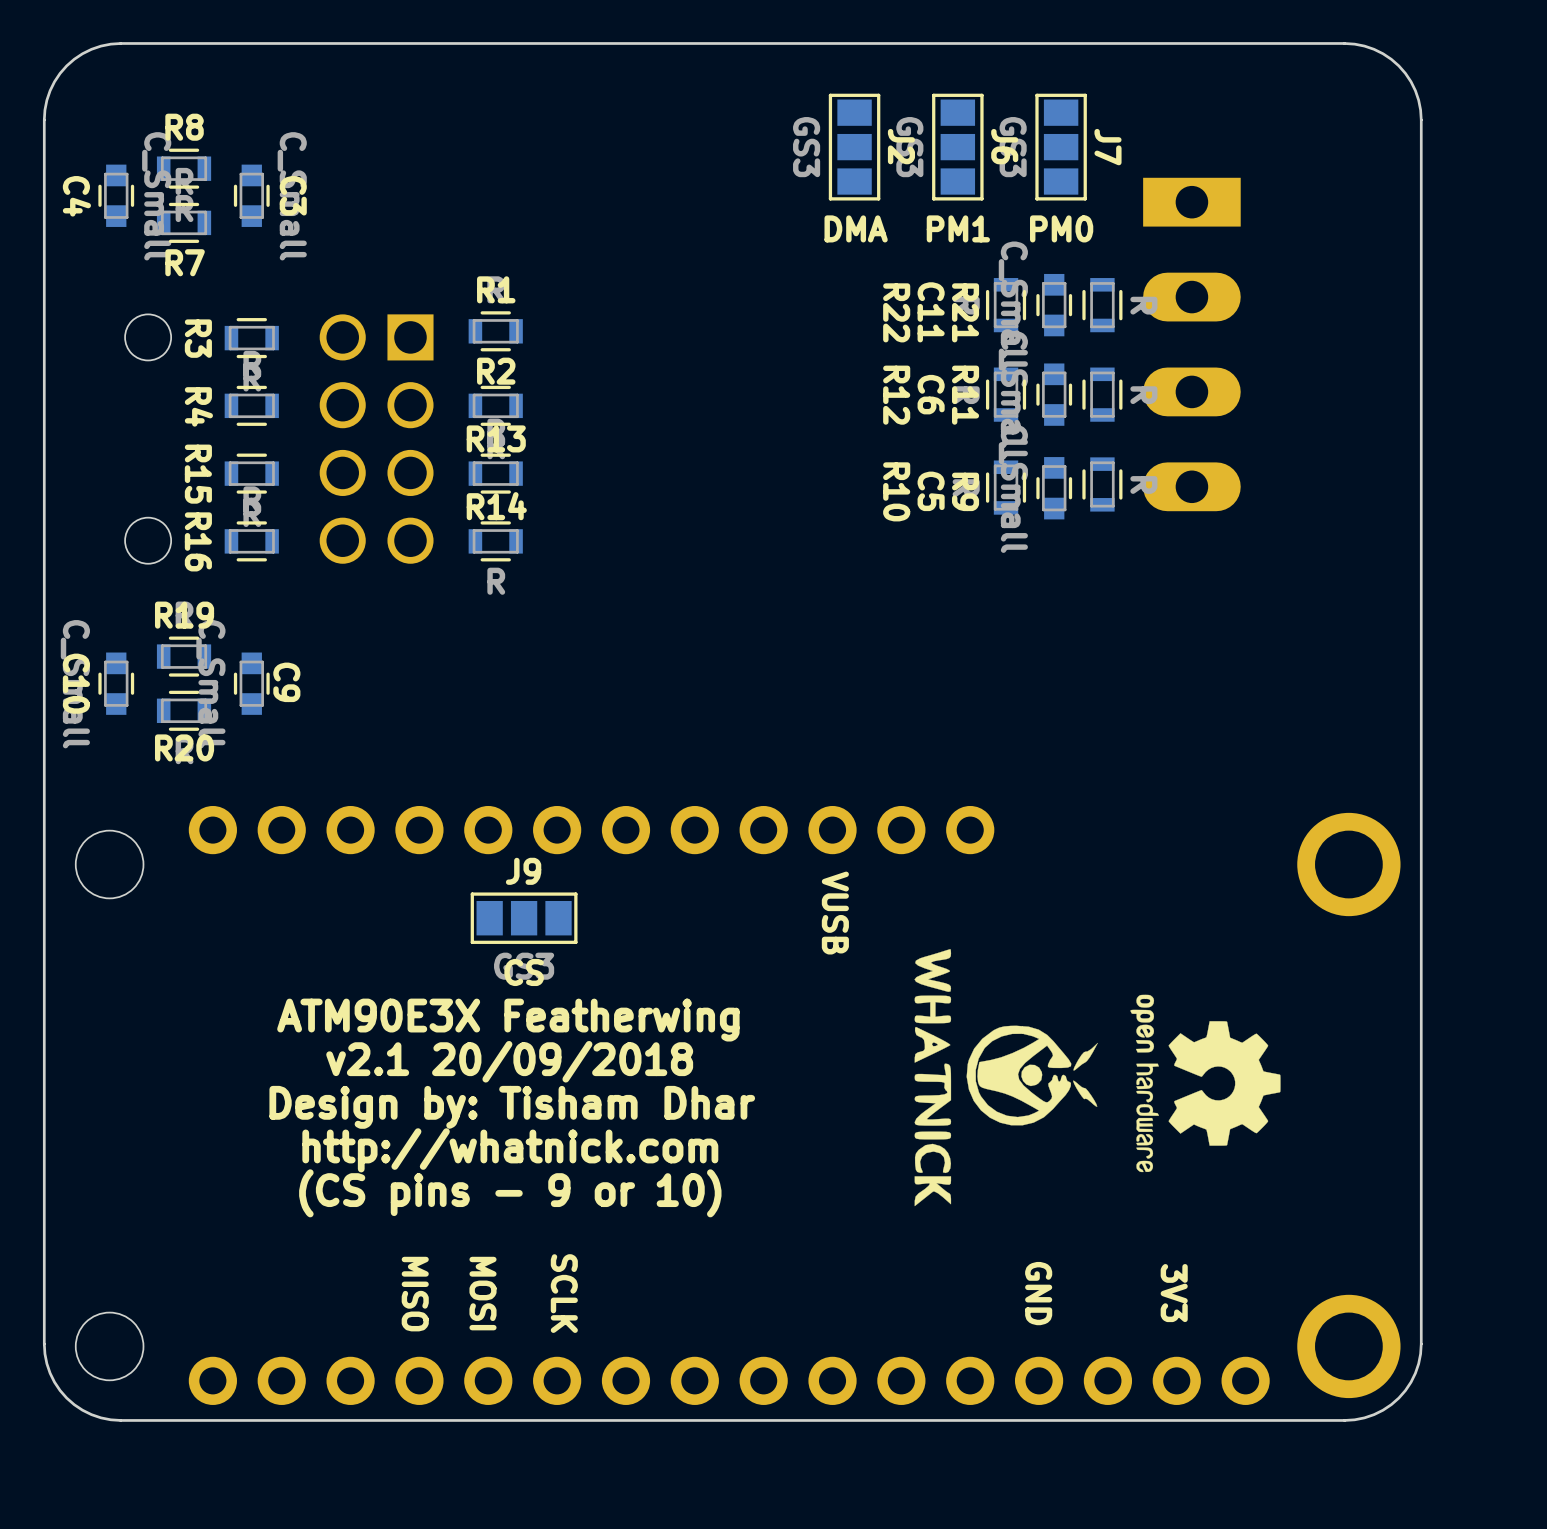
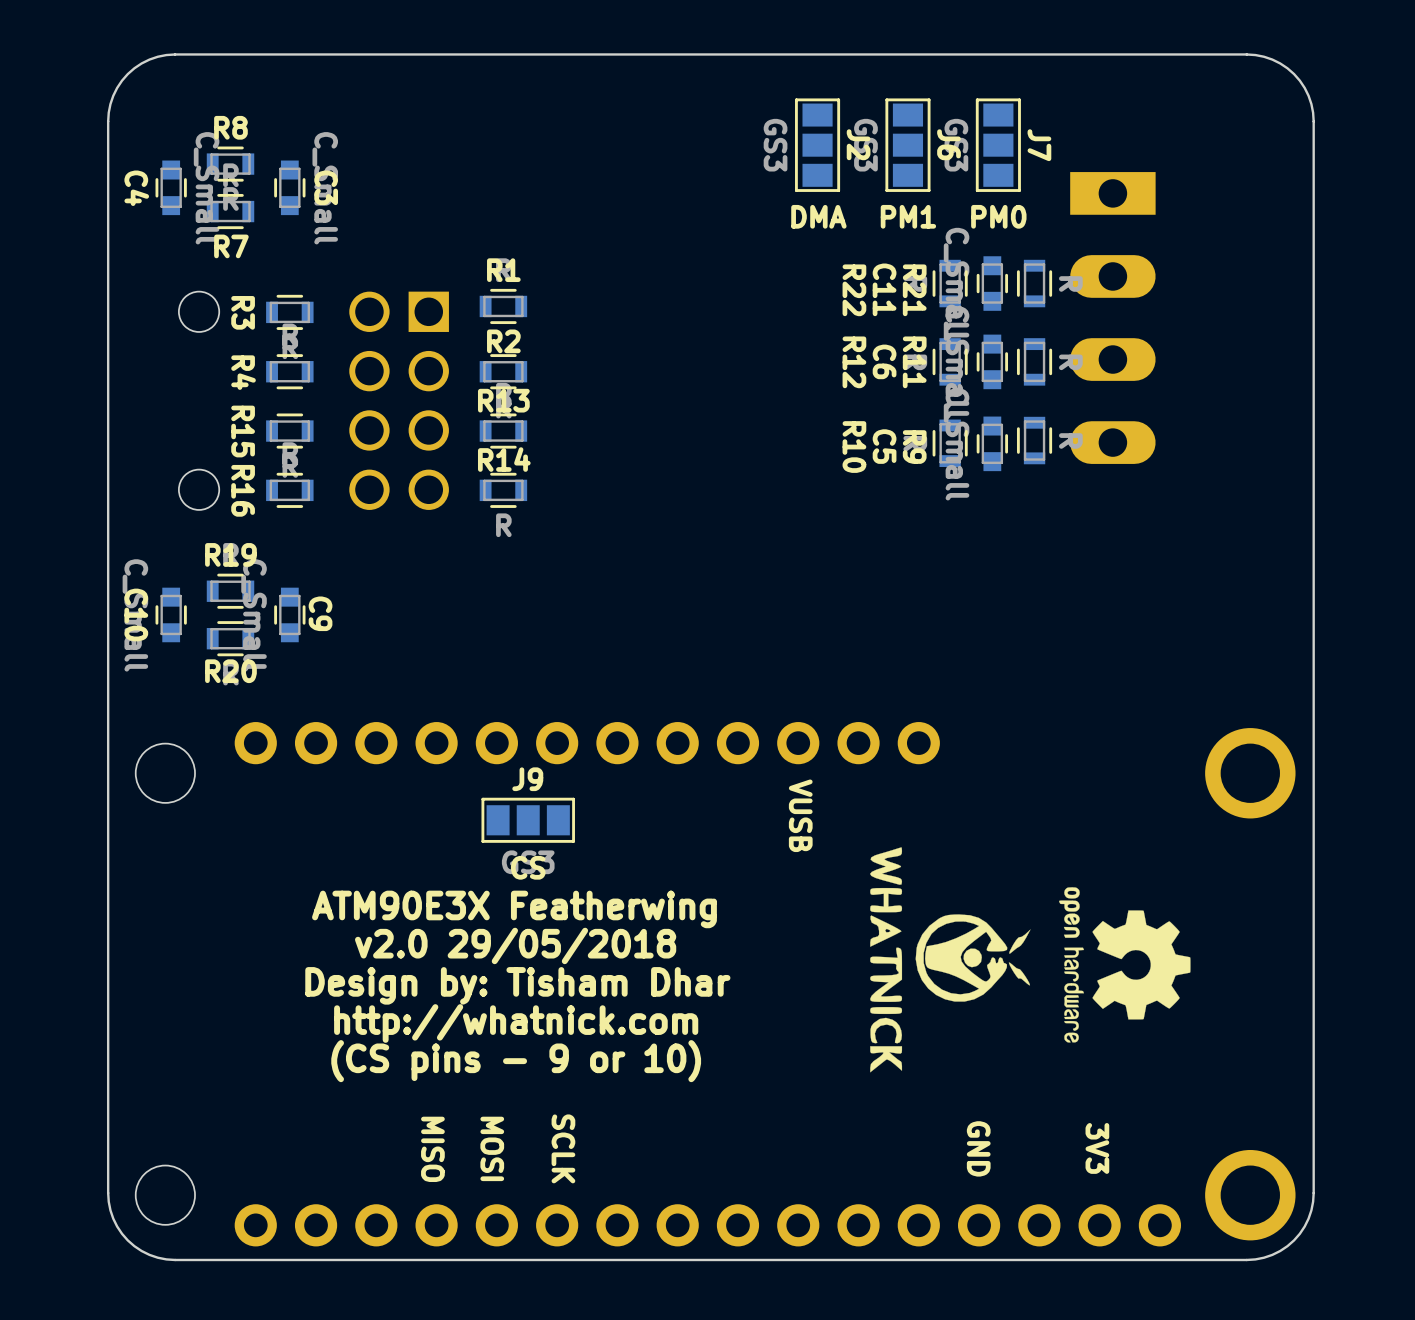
text: v2.1 20/09/2018 (509, 1061) -> v2.0 29/05/2018 (515, 945)

